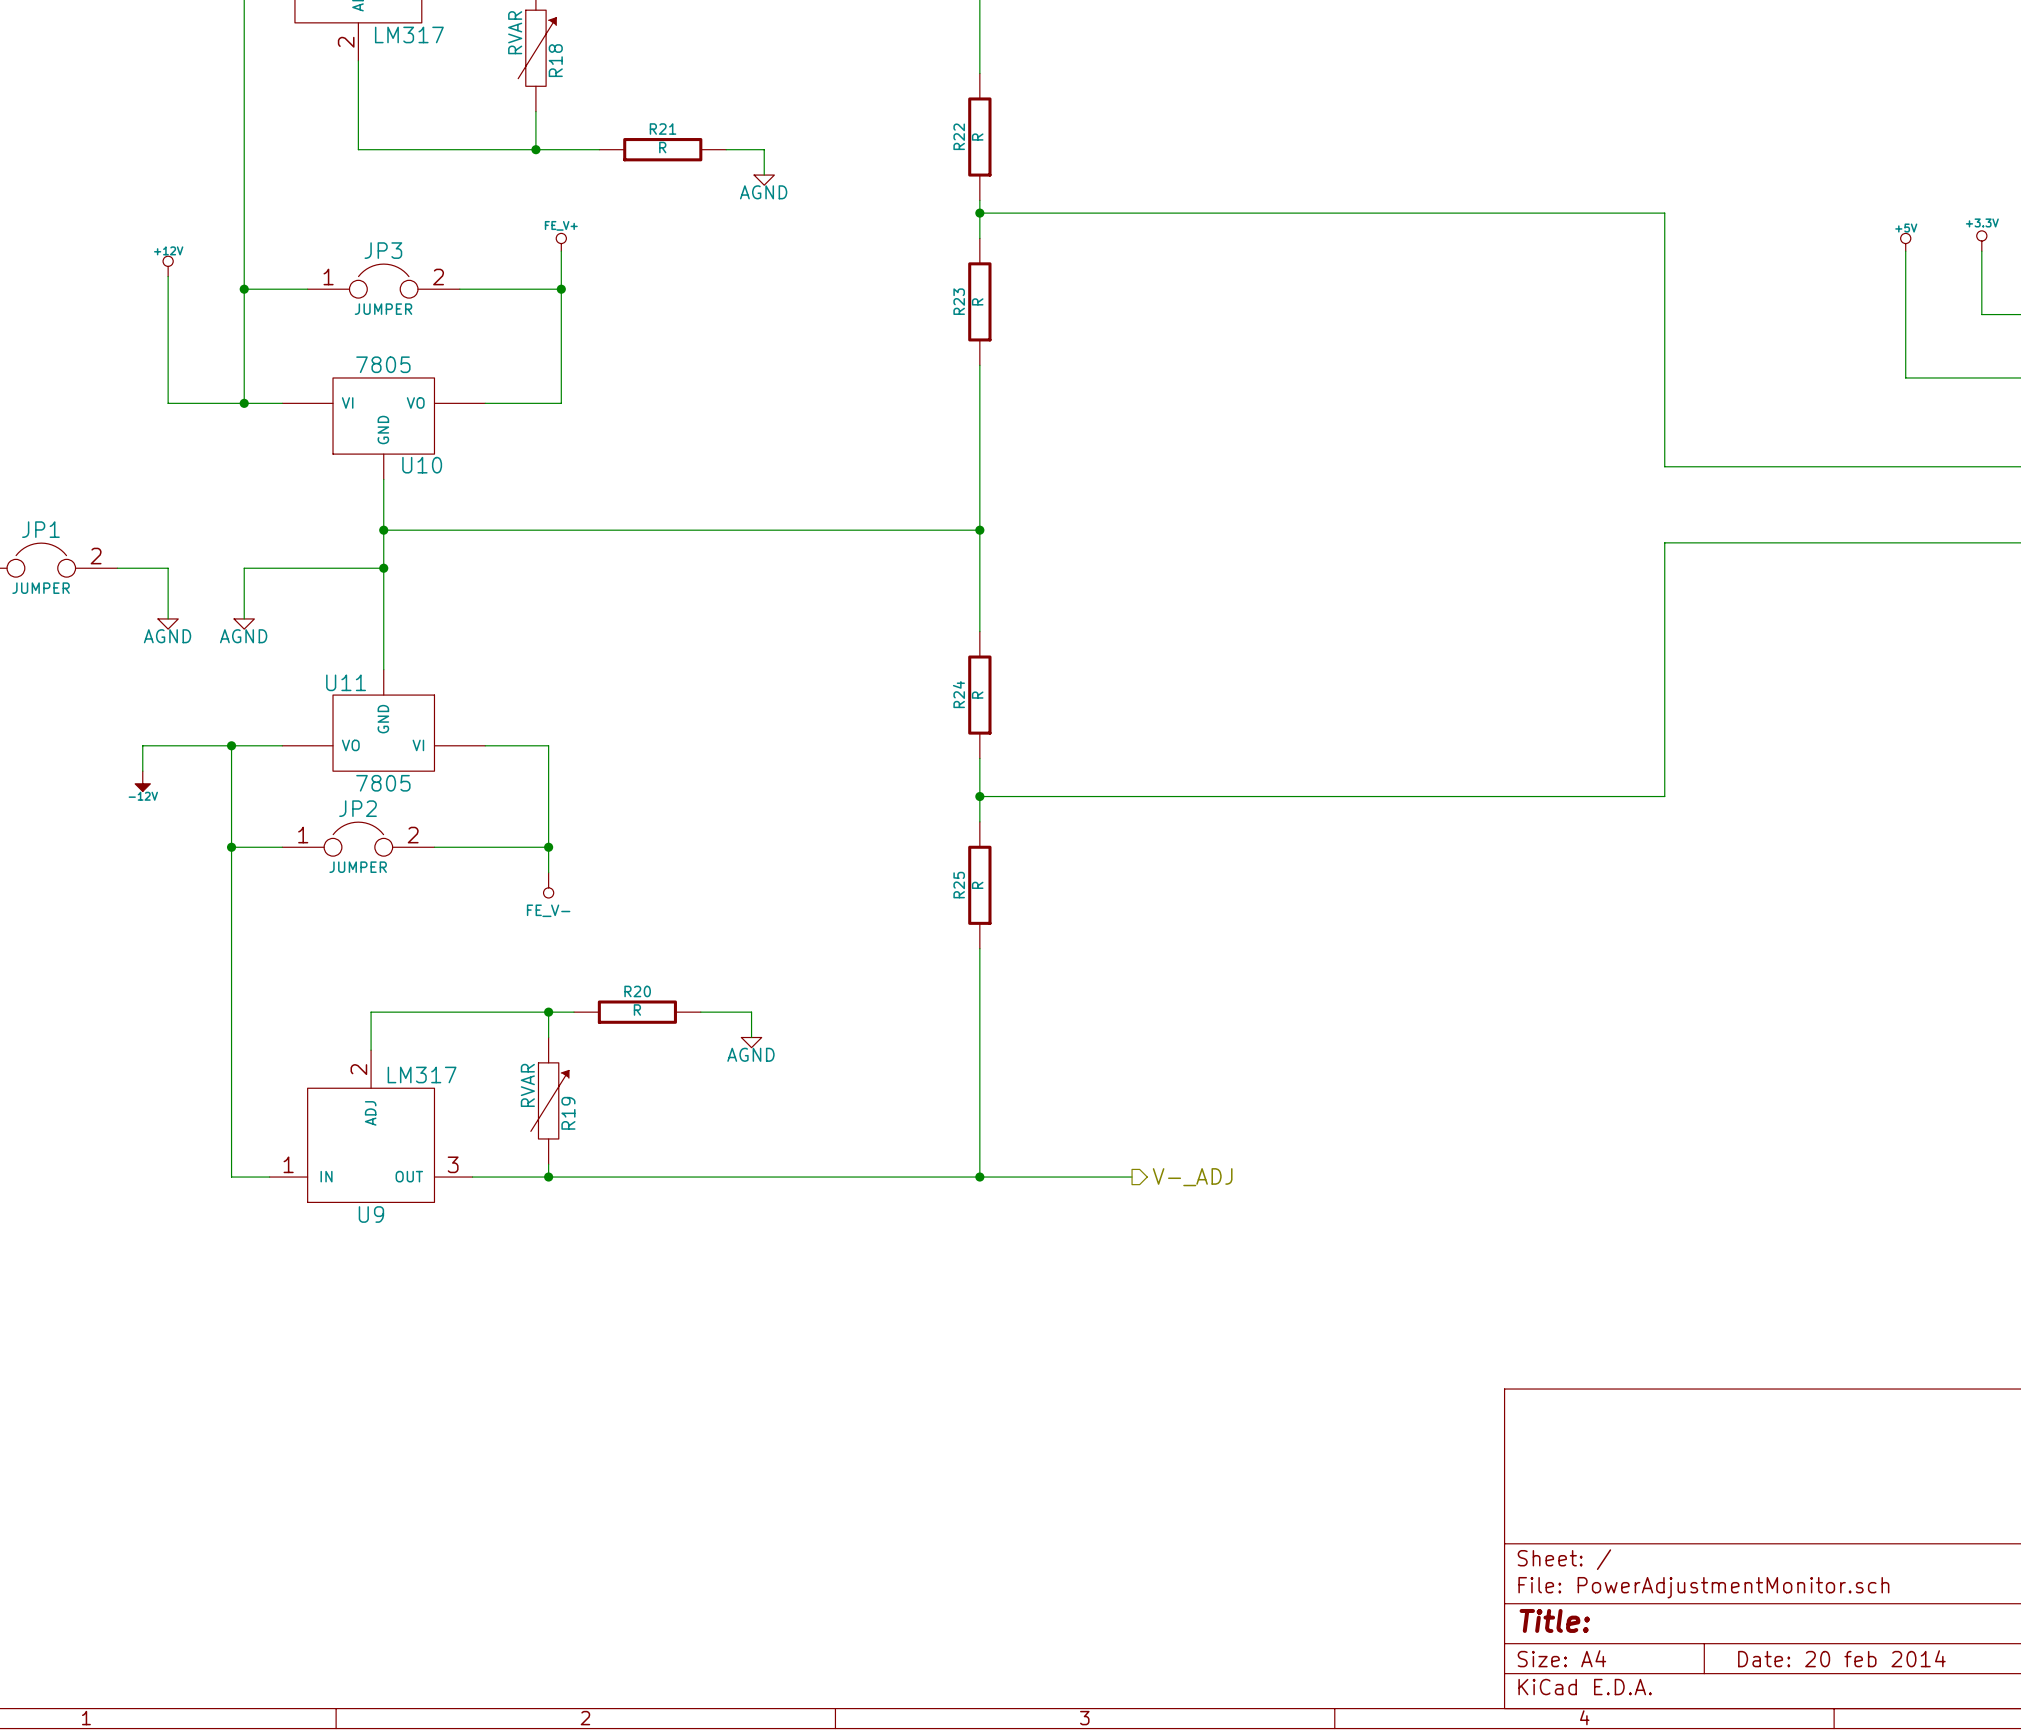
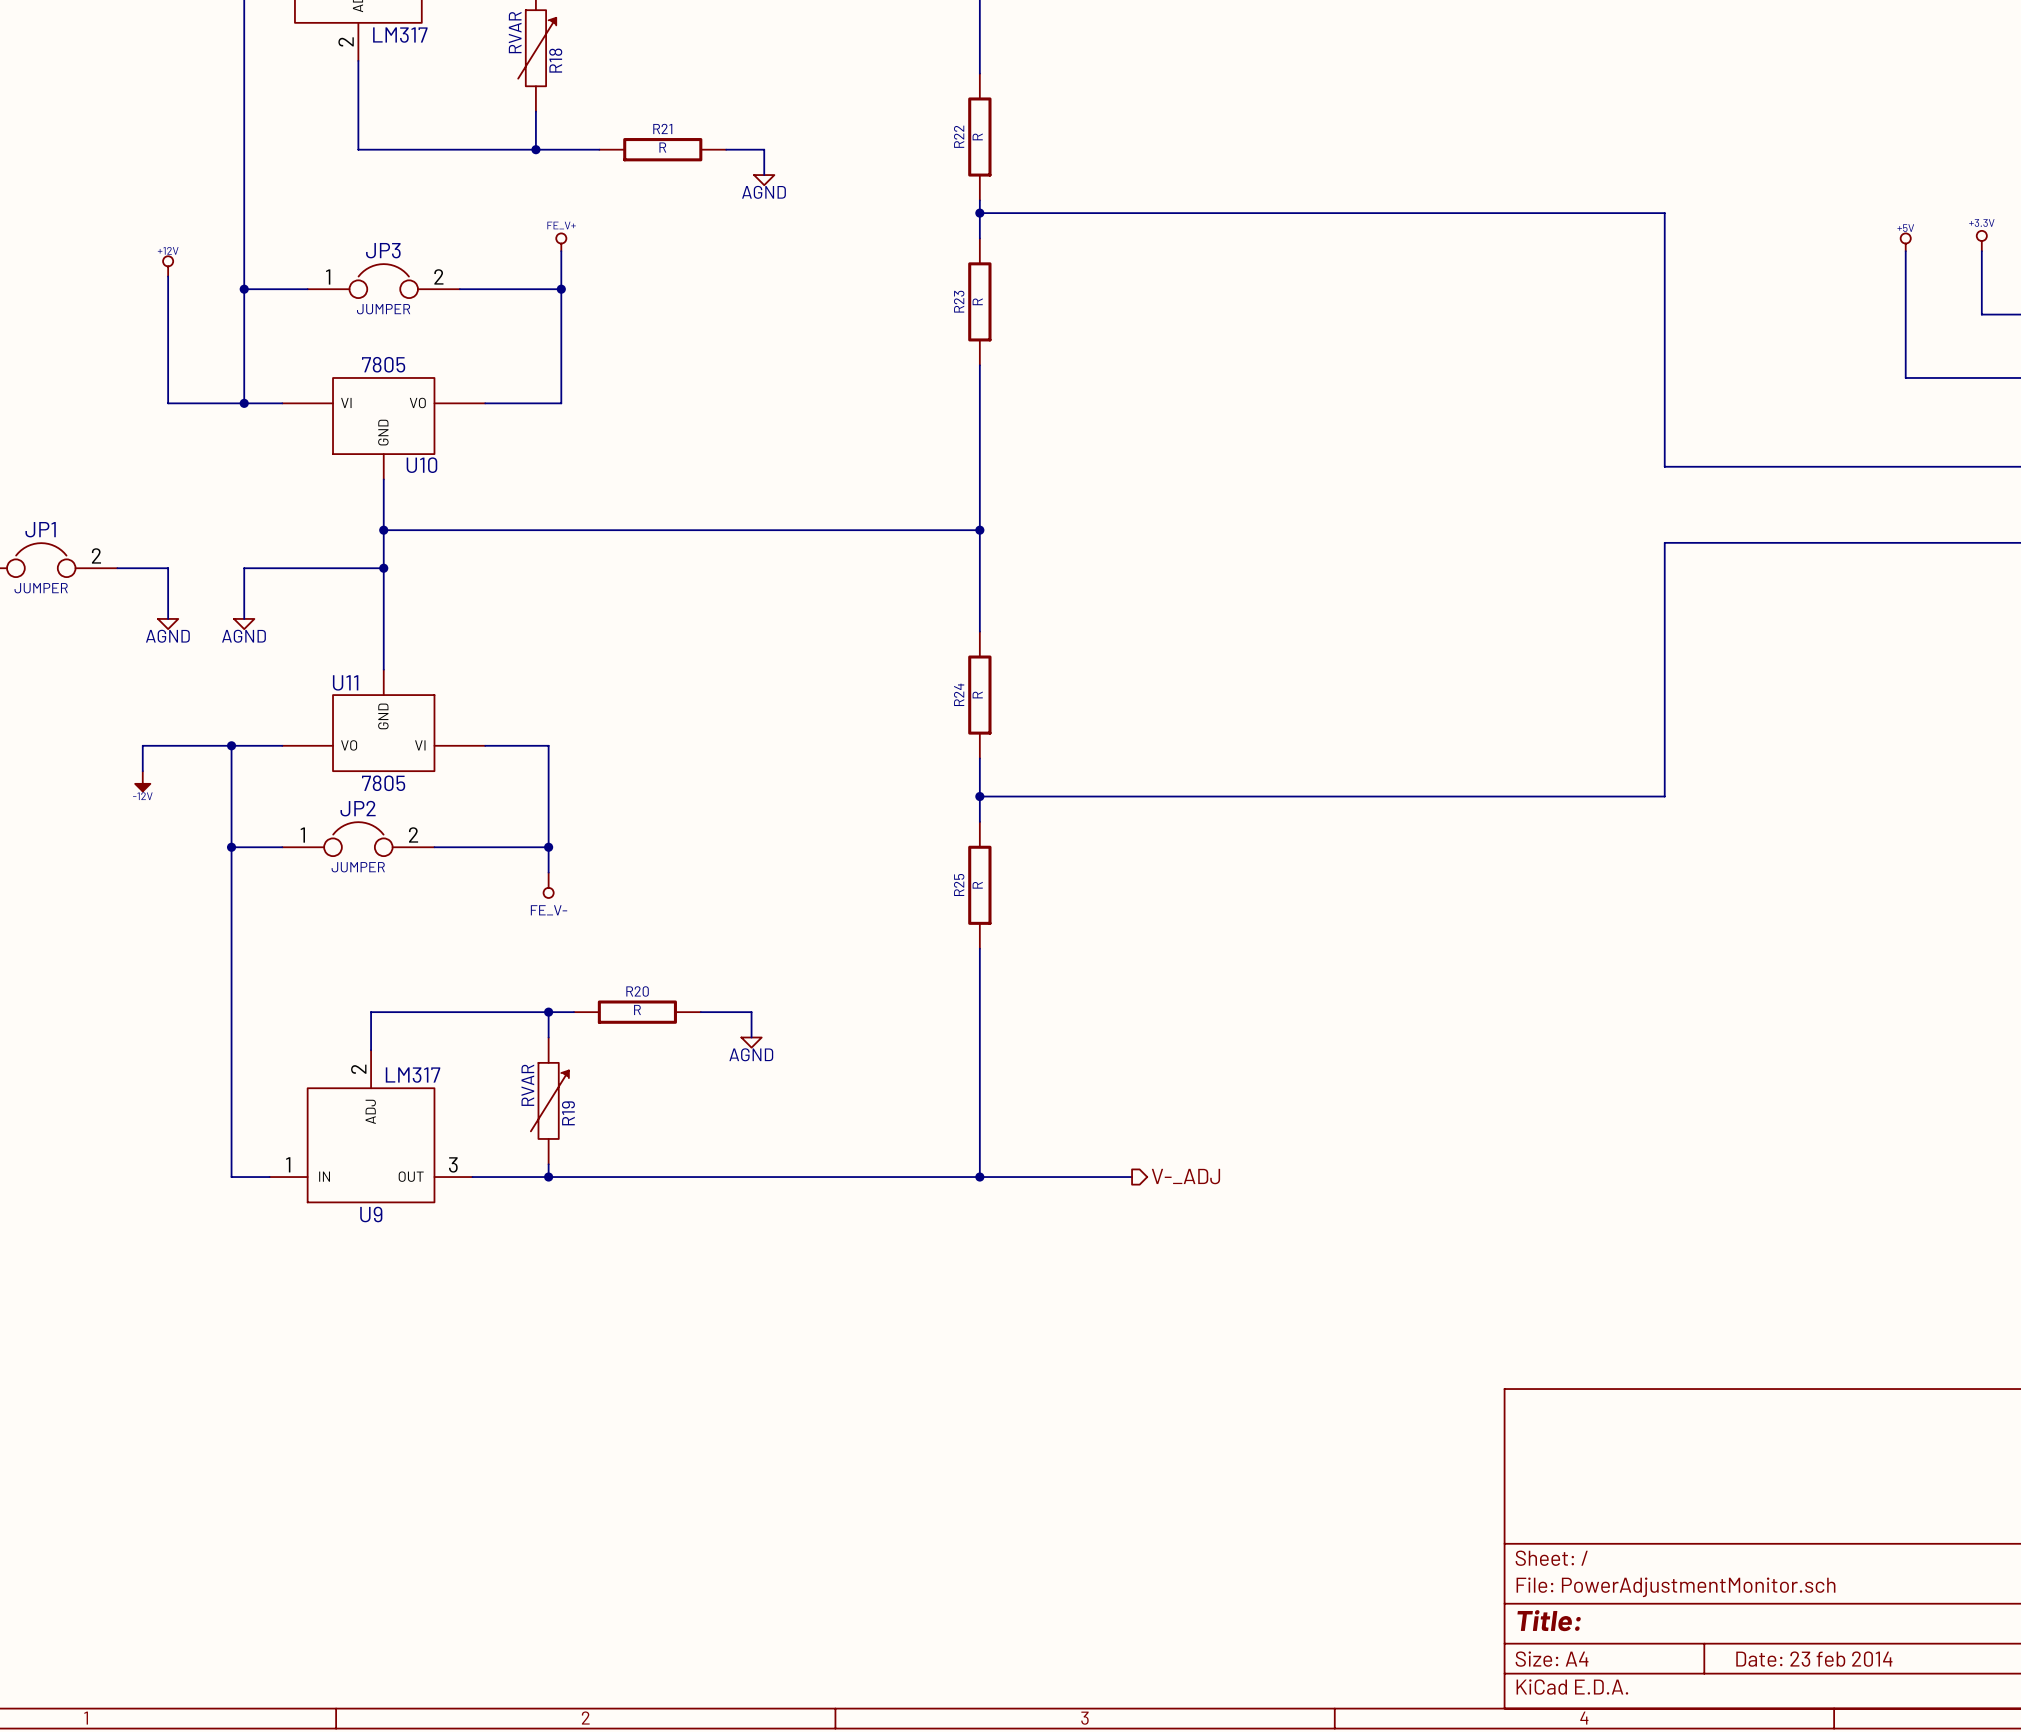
title block: Date: 20 feb 2014 (1841, 1658) -> Date: 23 feb 2014 (1814, 1659)

